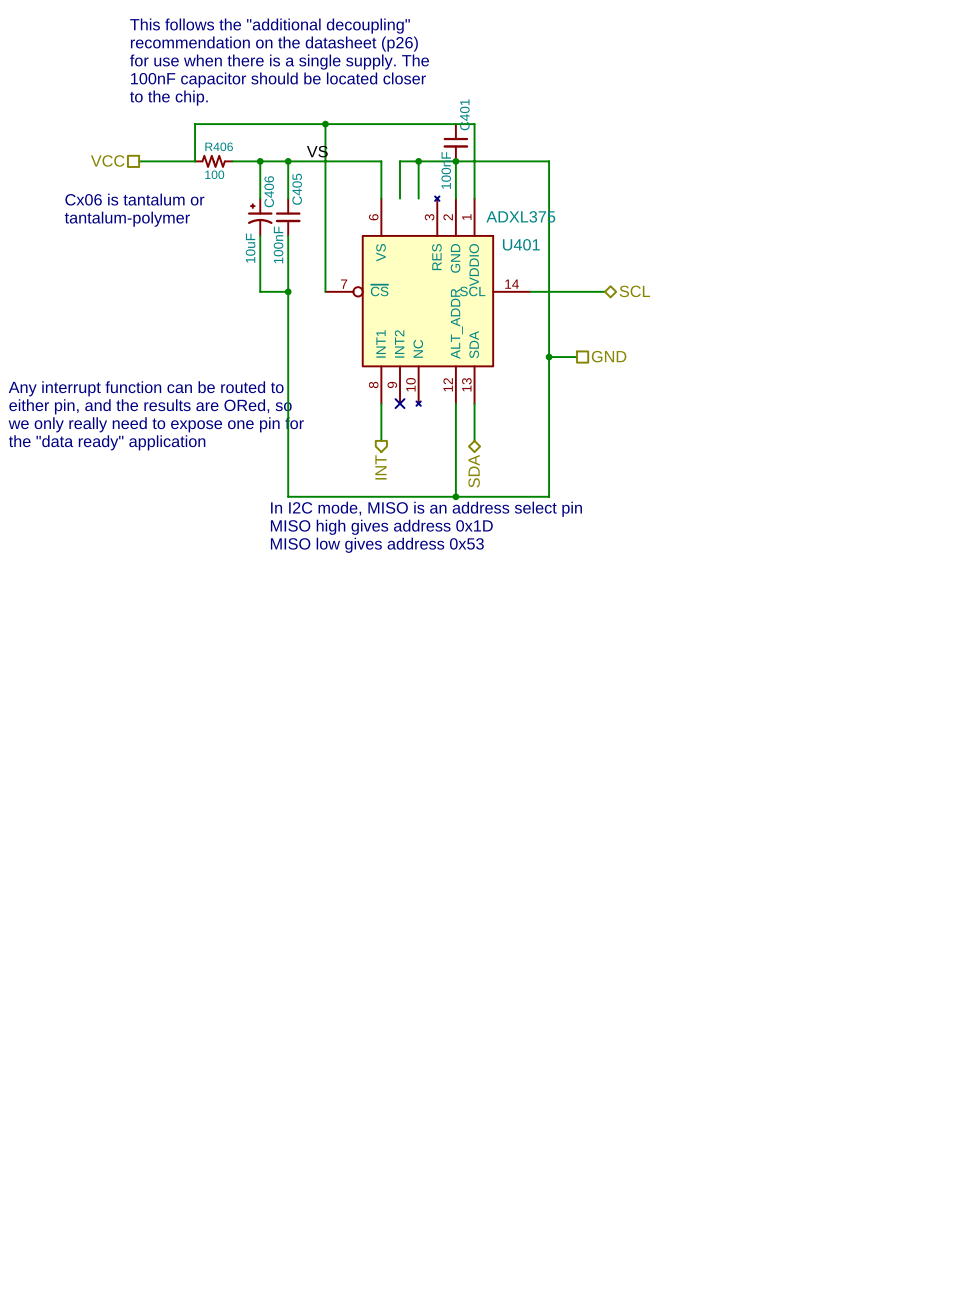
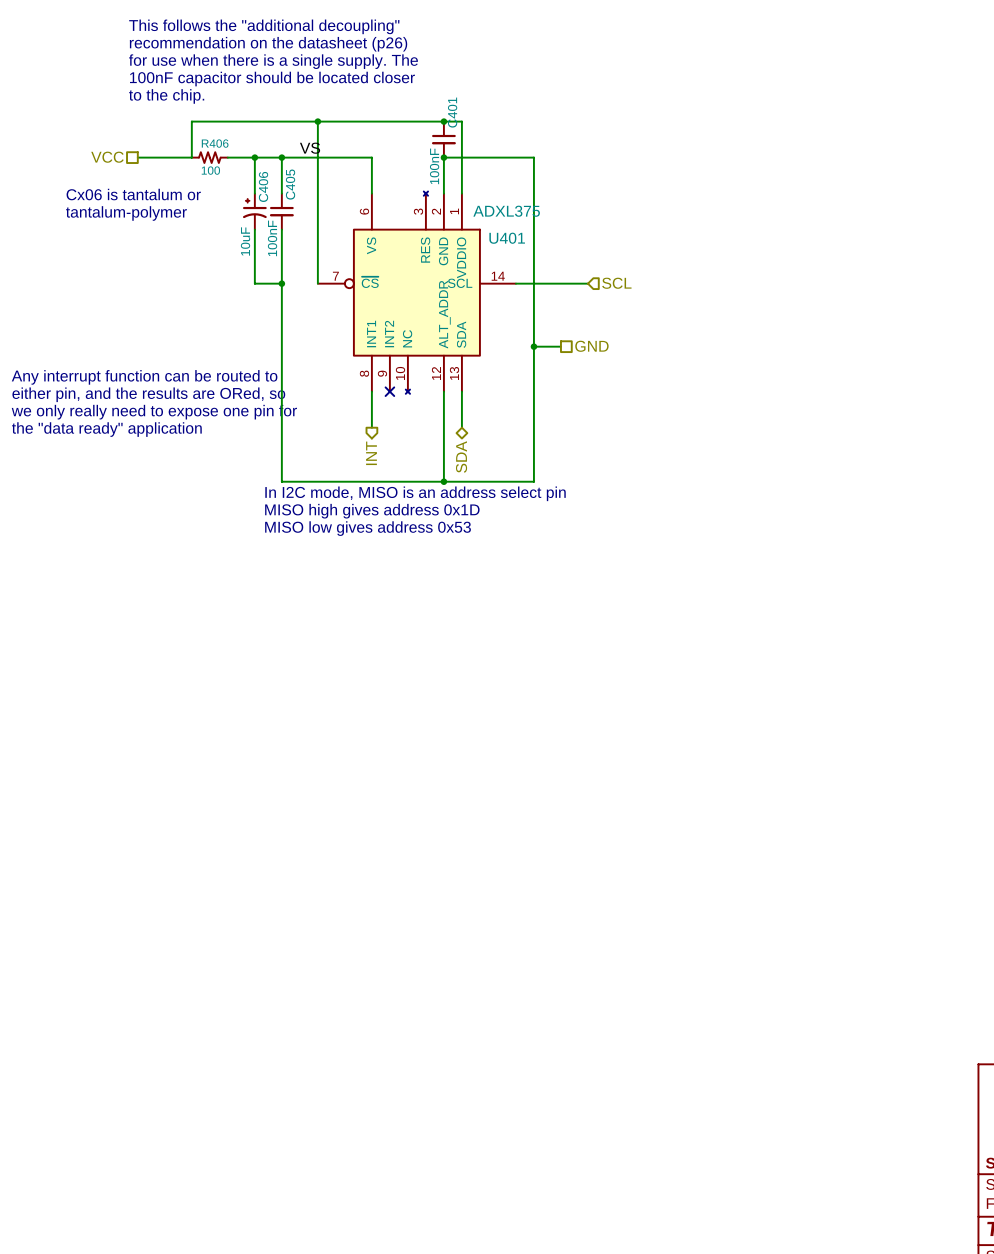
junction: none -> (443, 121)
wire: (418, 161) (418, 198) -> none
junction: (418, 161) -> none
wire: (455, 161) (400, 161) (400, 198) -> none
hierarchical label shape: bidirectional (634, 291) -> input (616, 283)

